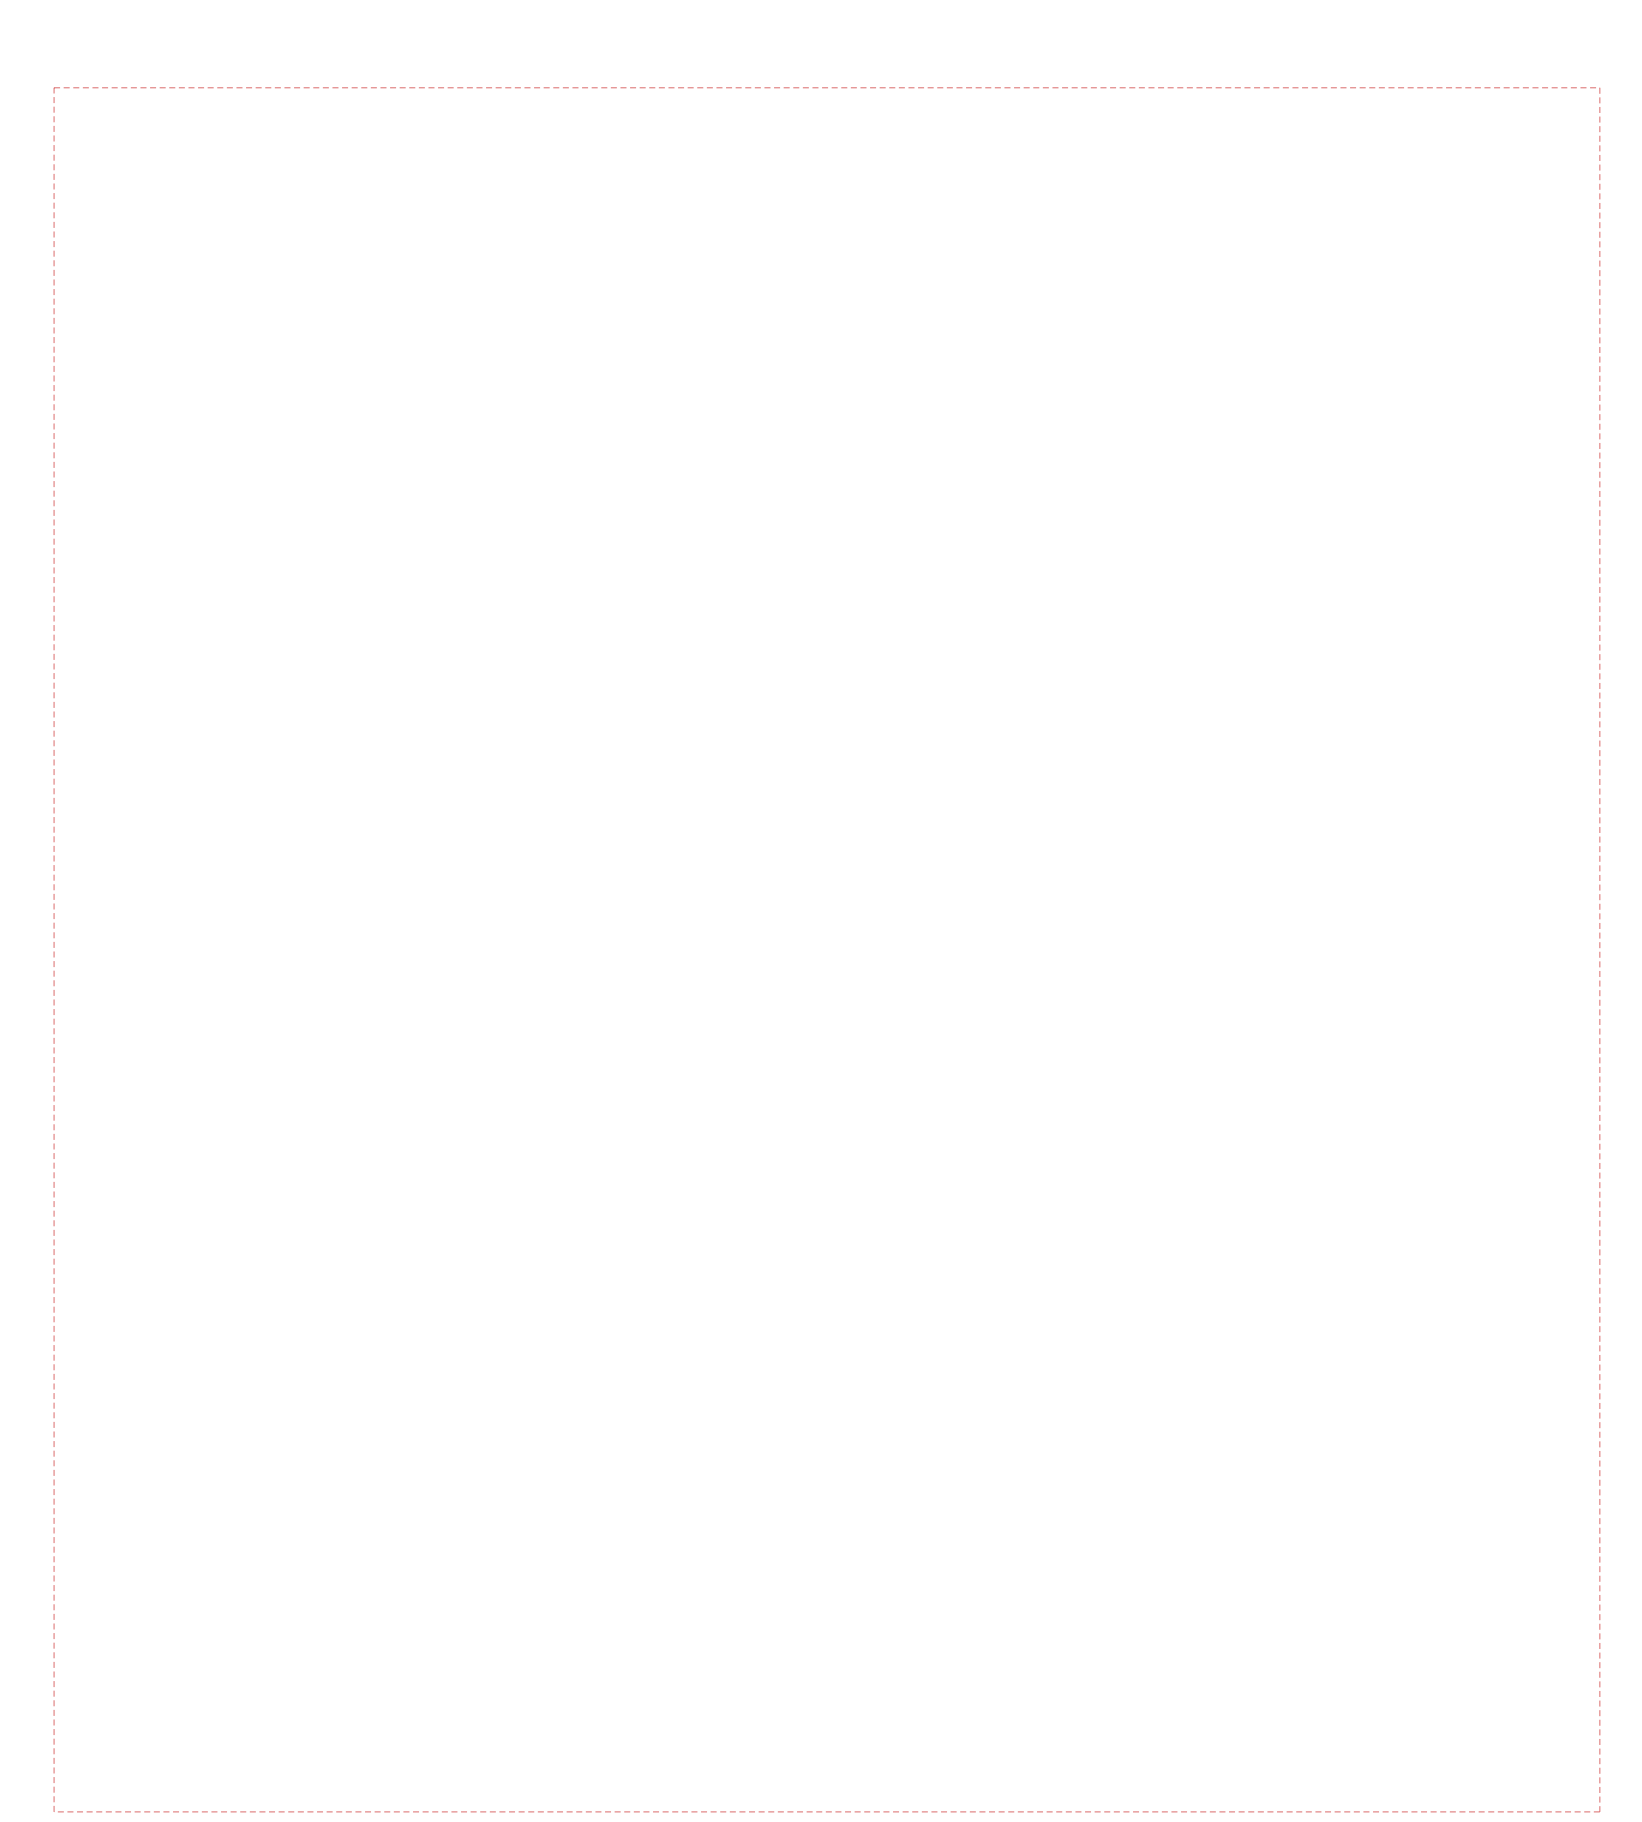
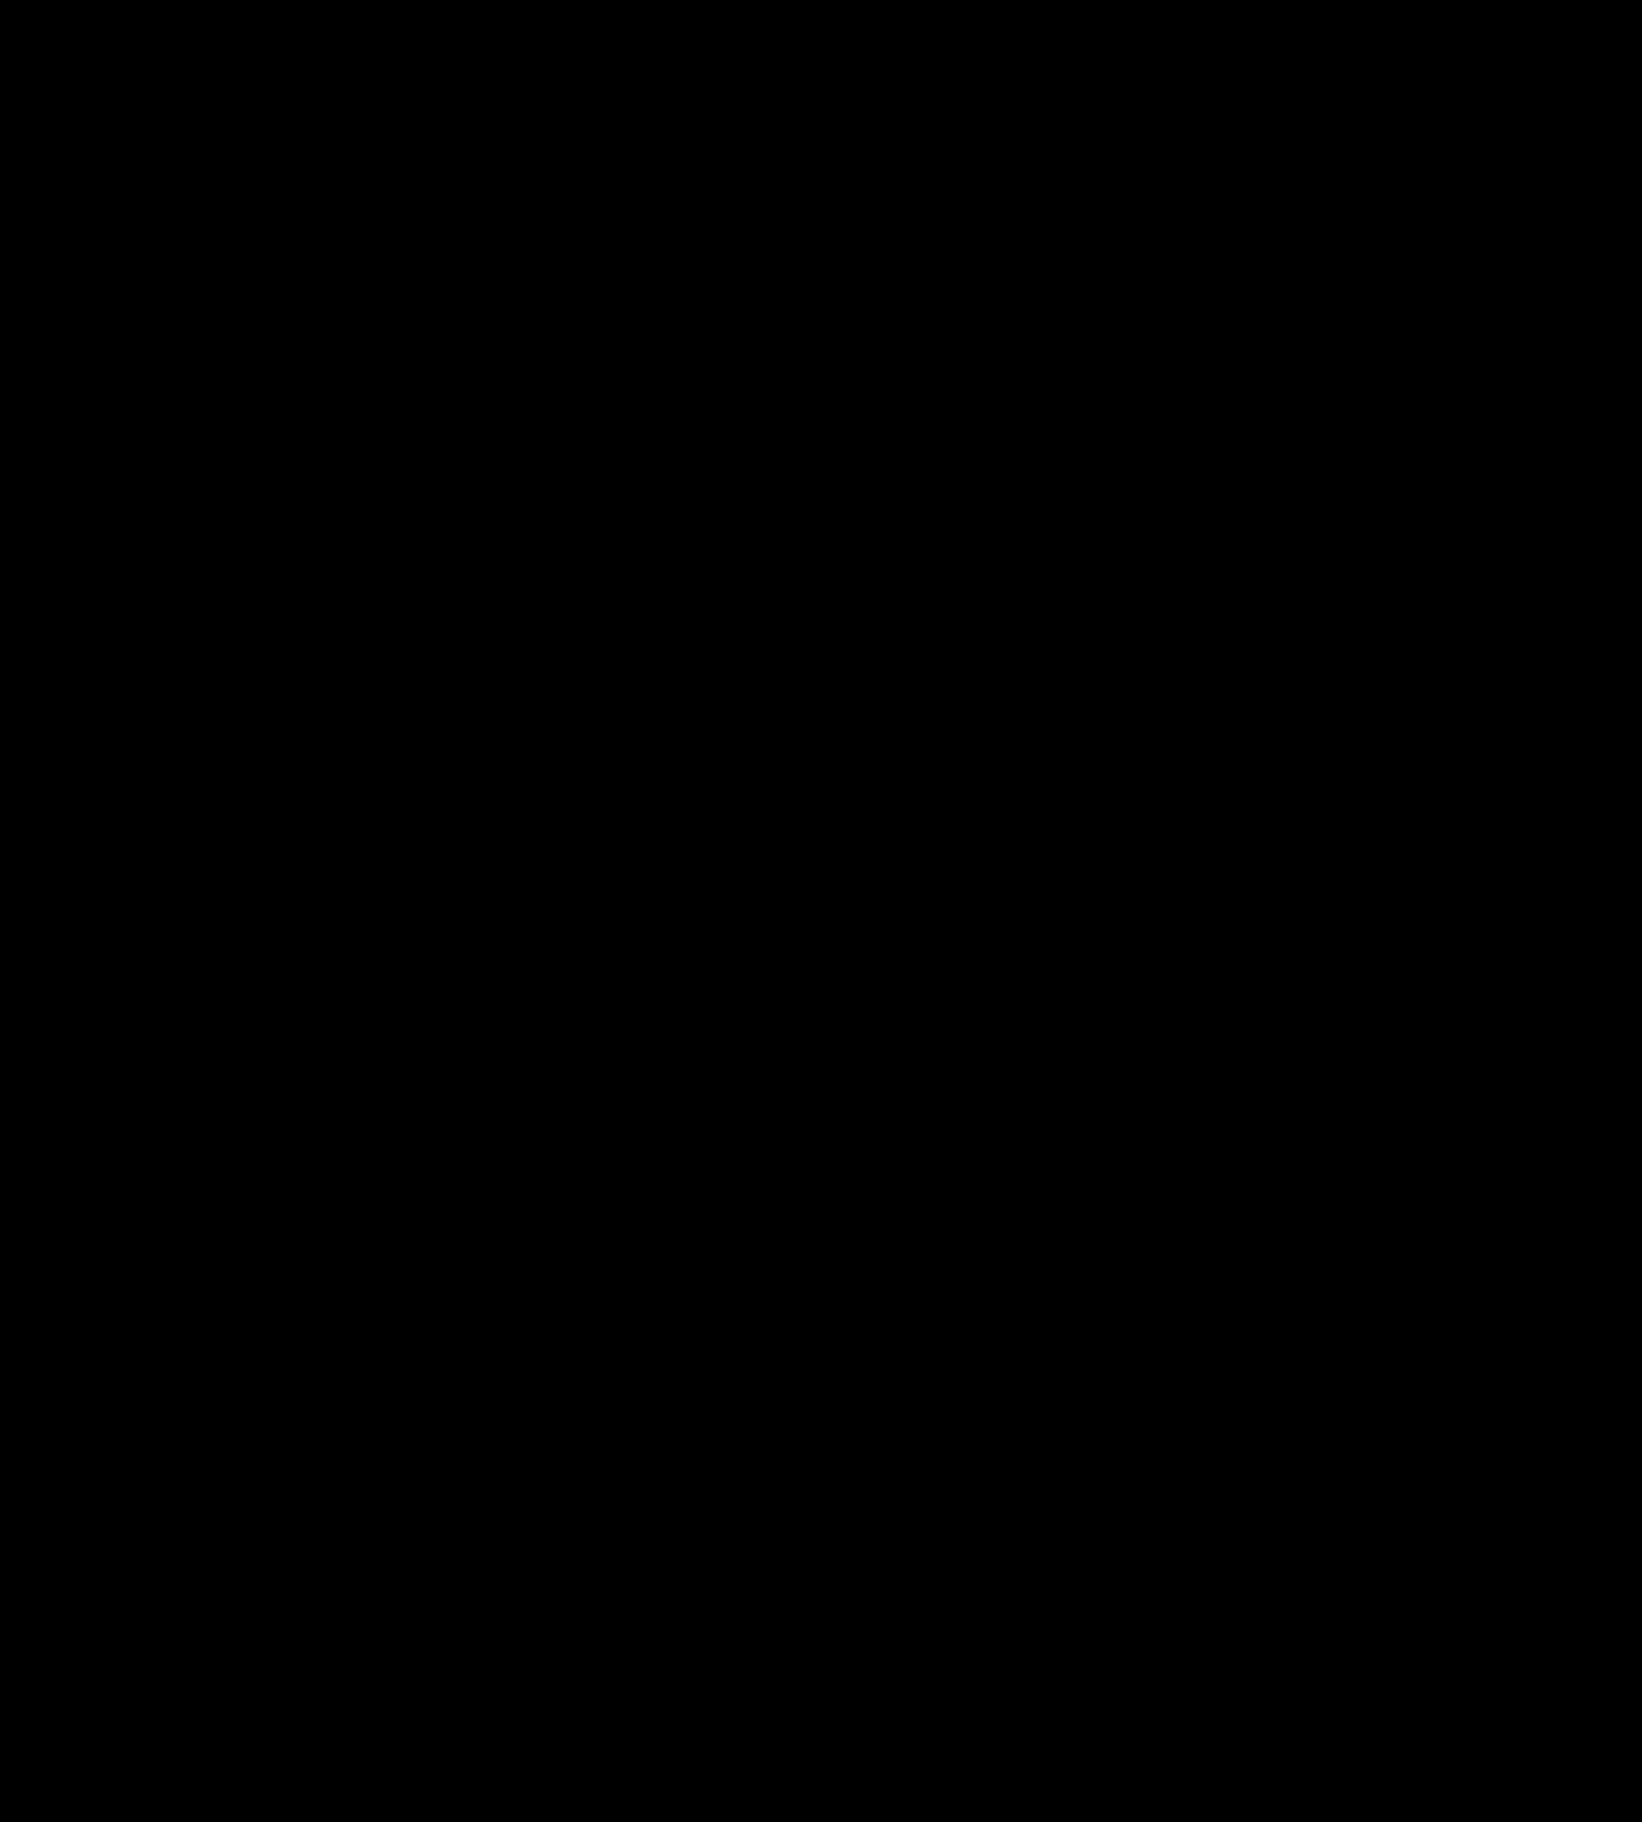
zone outline: (54, 87) (54, 1811) (1599, 1811) (1599, 87) (54, 87) -> none

